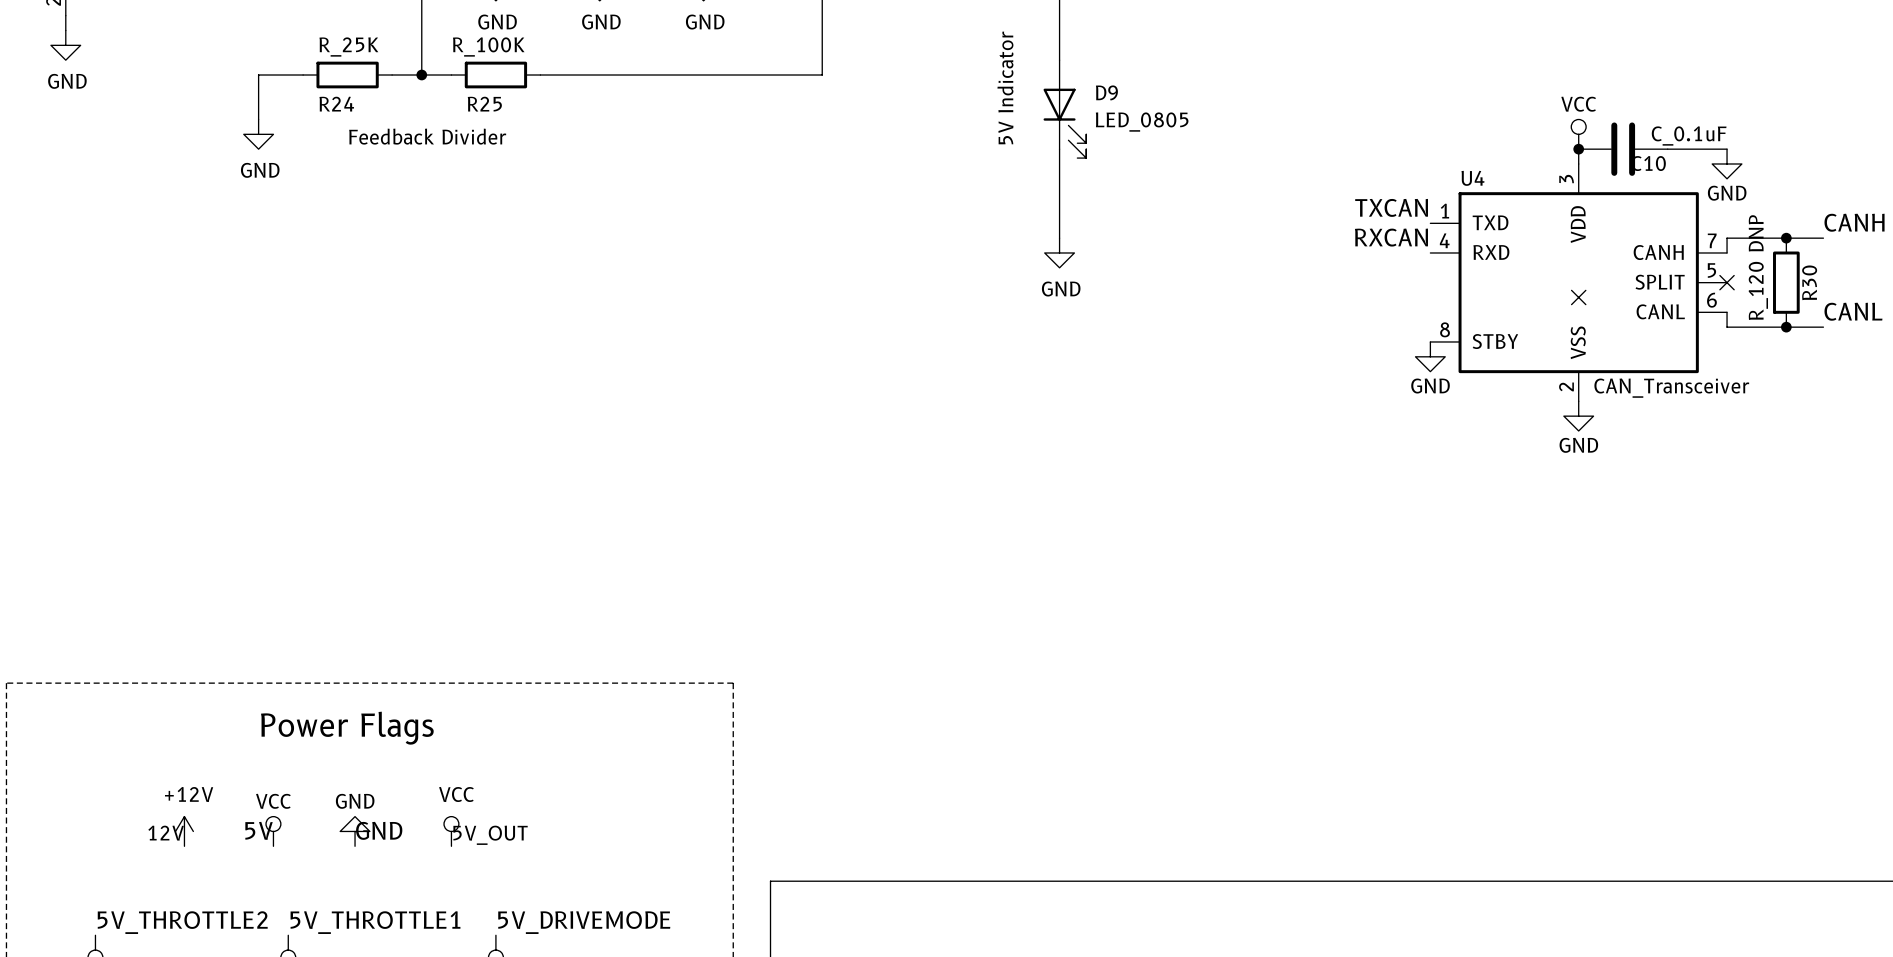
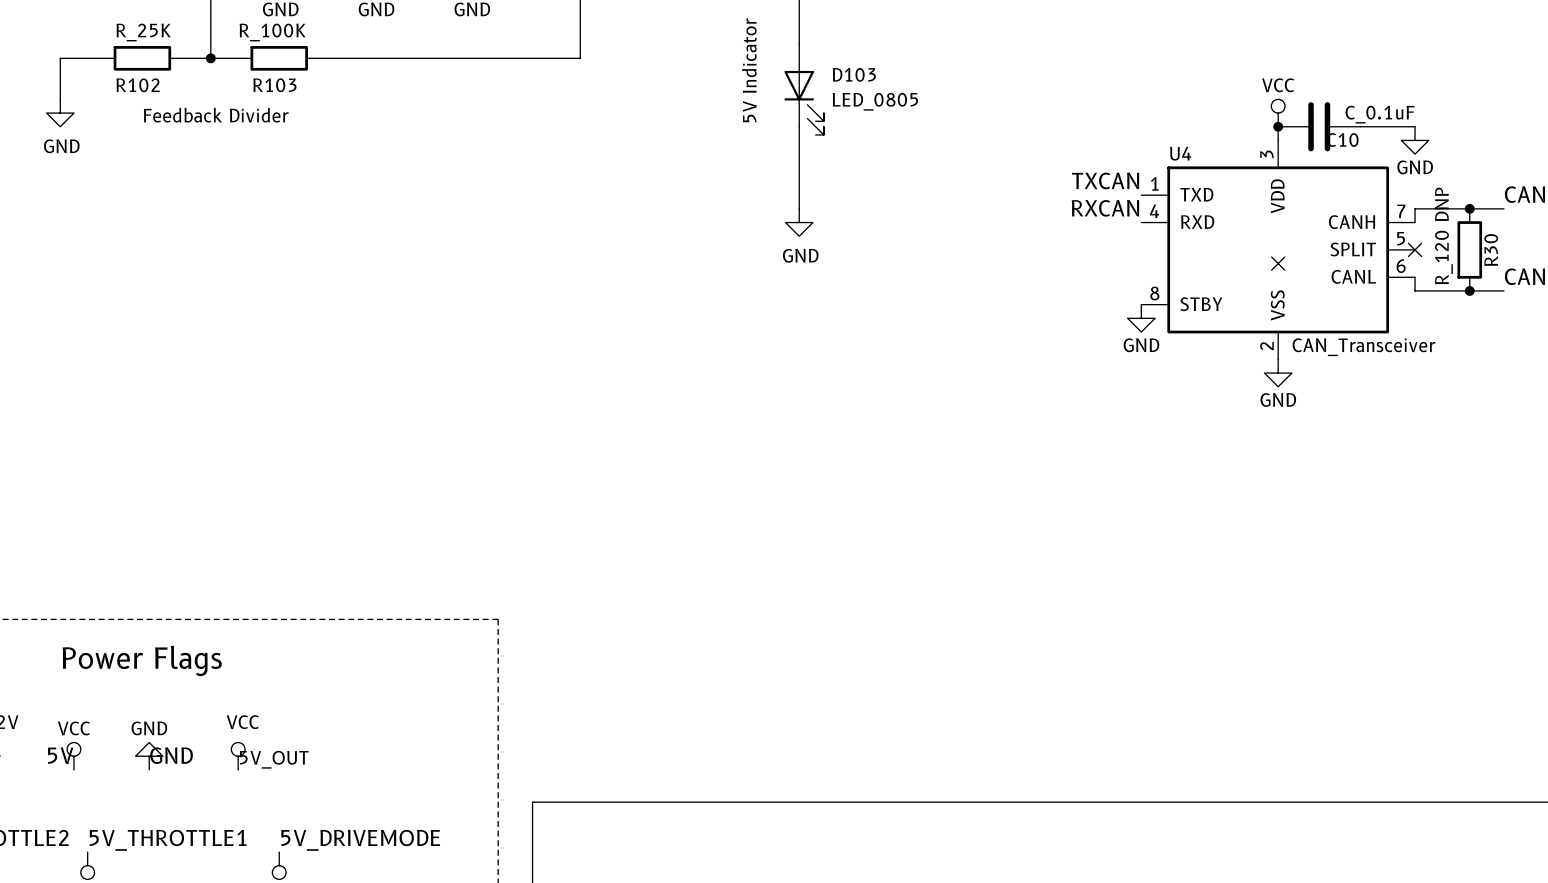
D9 name: D9 (1106, 92) -> D103 (854, 74)
R24 name: R24 (336, 104) -> R102 (138, 85)
R25 name: R25 (484, 104) -> R103 (274, 85)

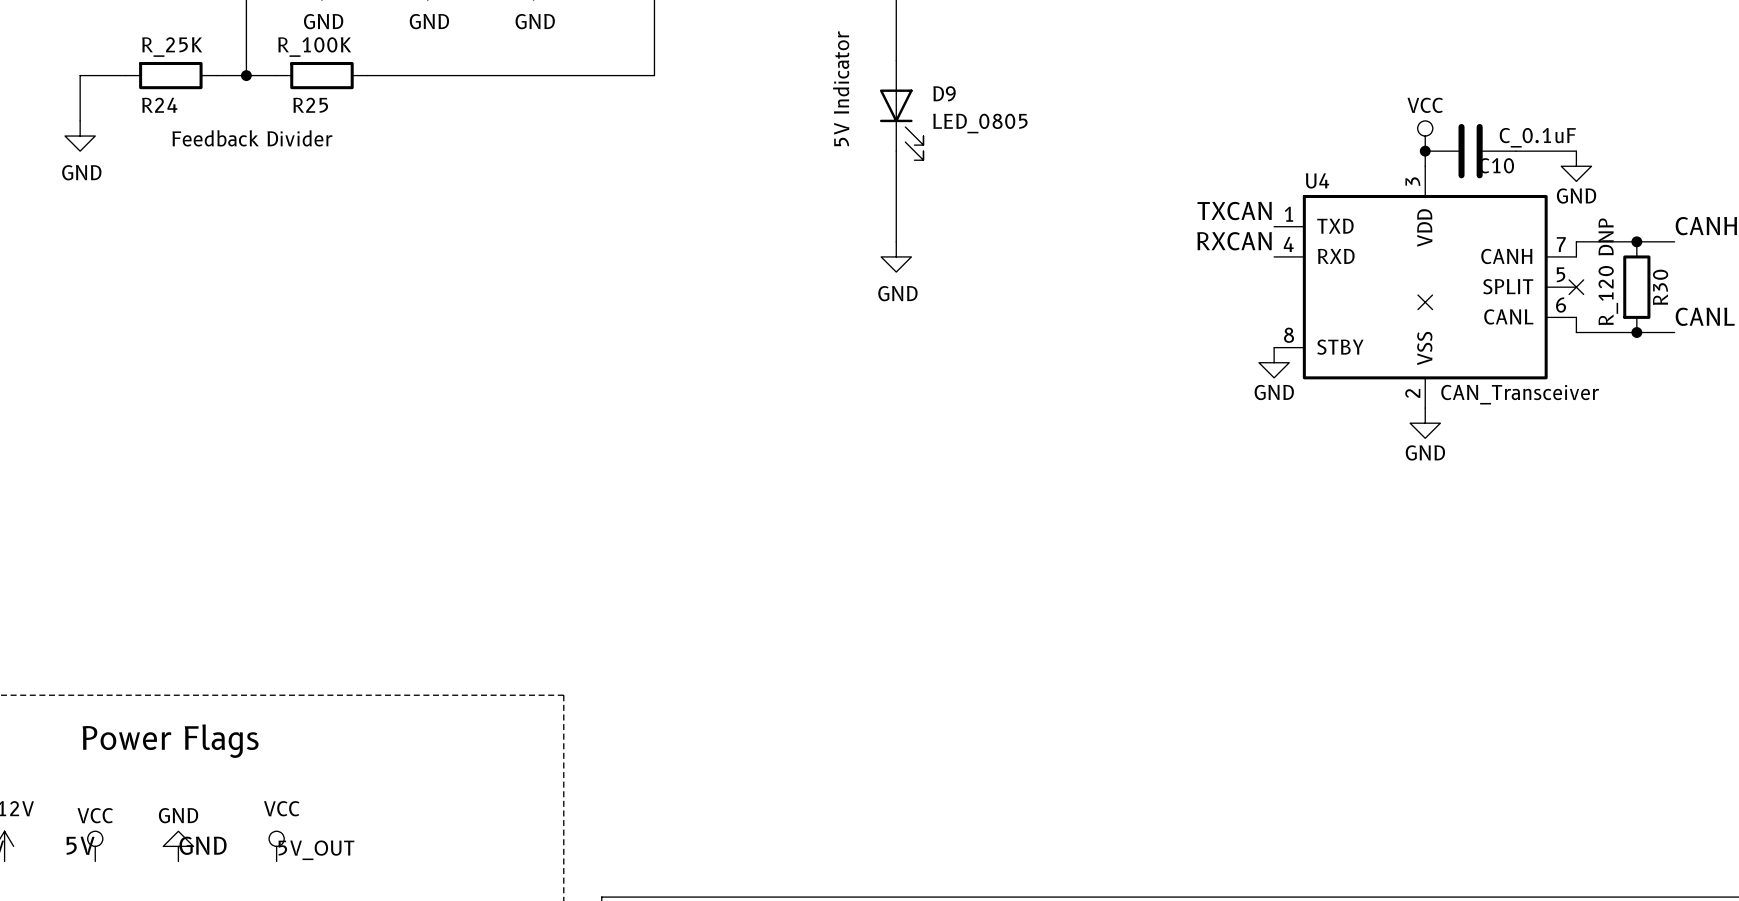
D103 name: D103 (854, 74) -> D9 (944, 93)
R102 name: R102 (138, 85) -> R24 (159, 105)
R103 name: R103 (274, 85) -> R25 (310, 105)

